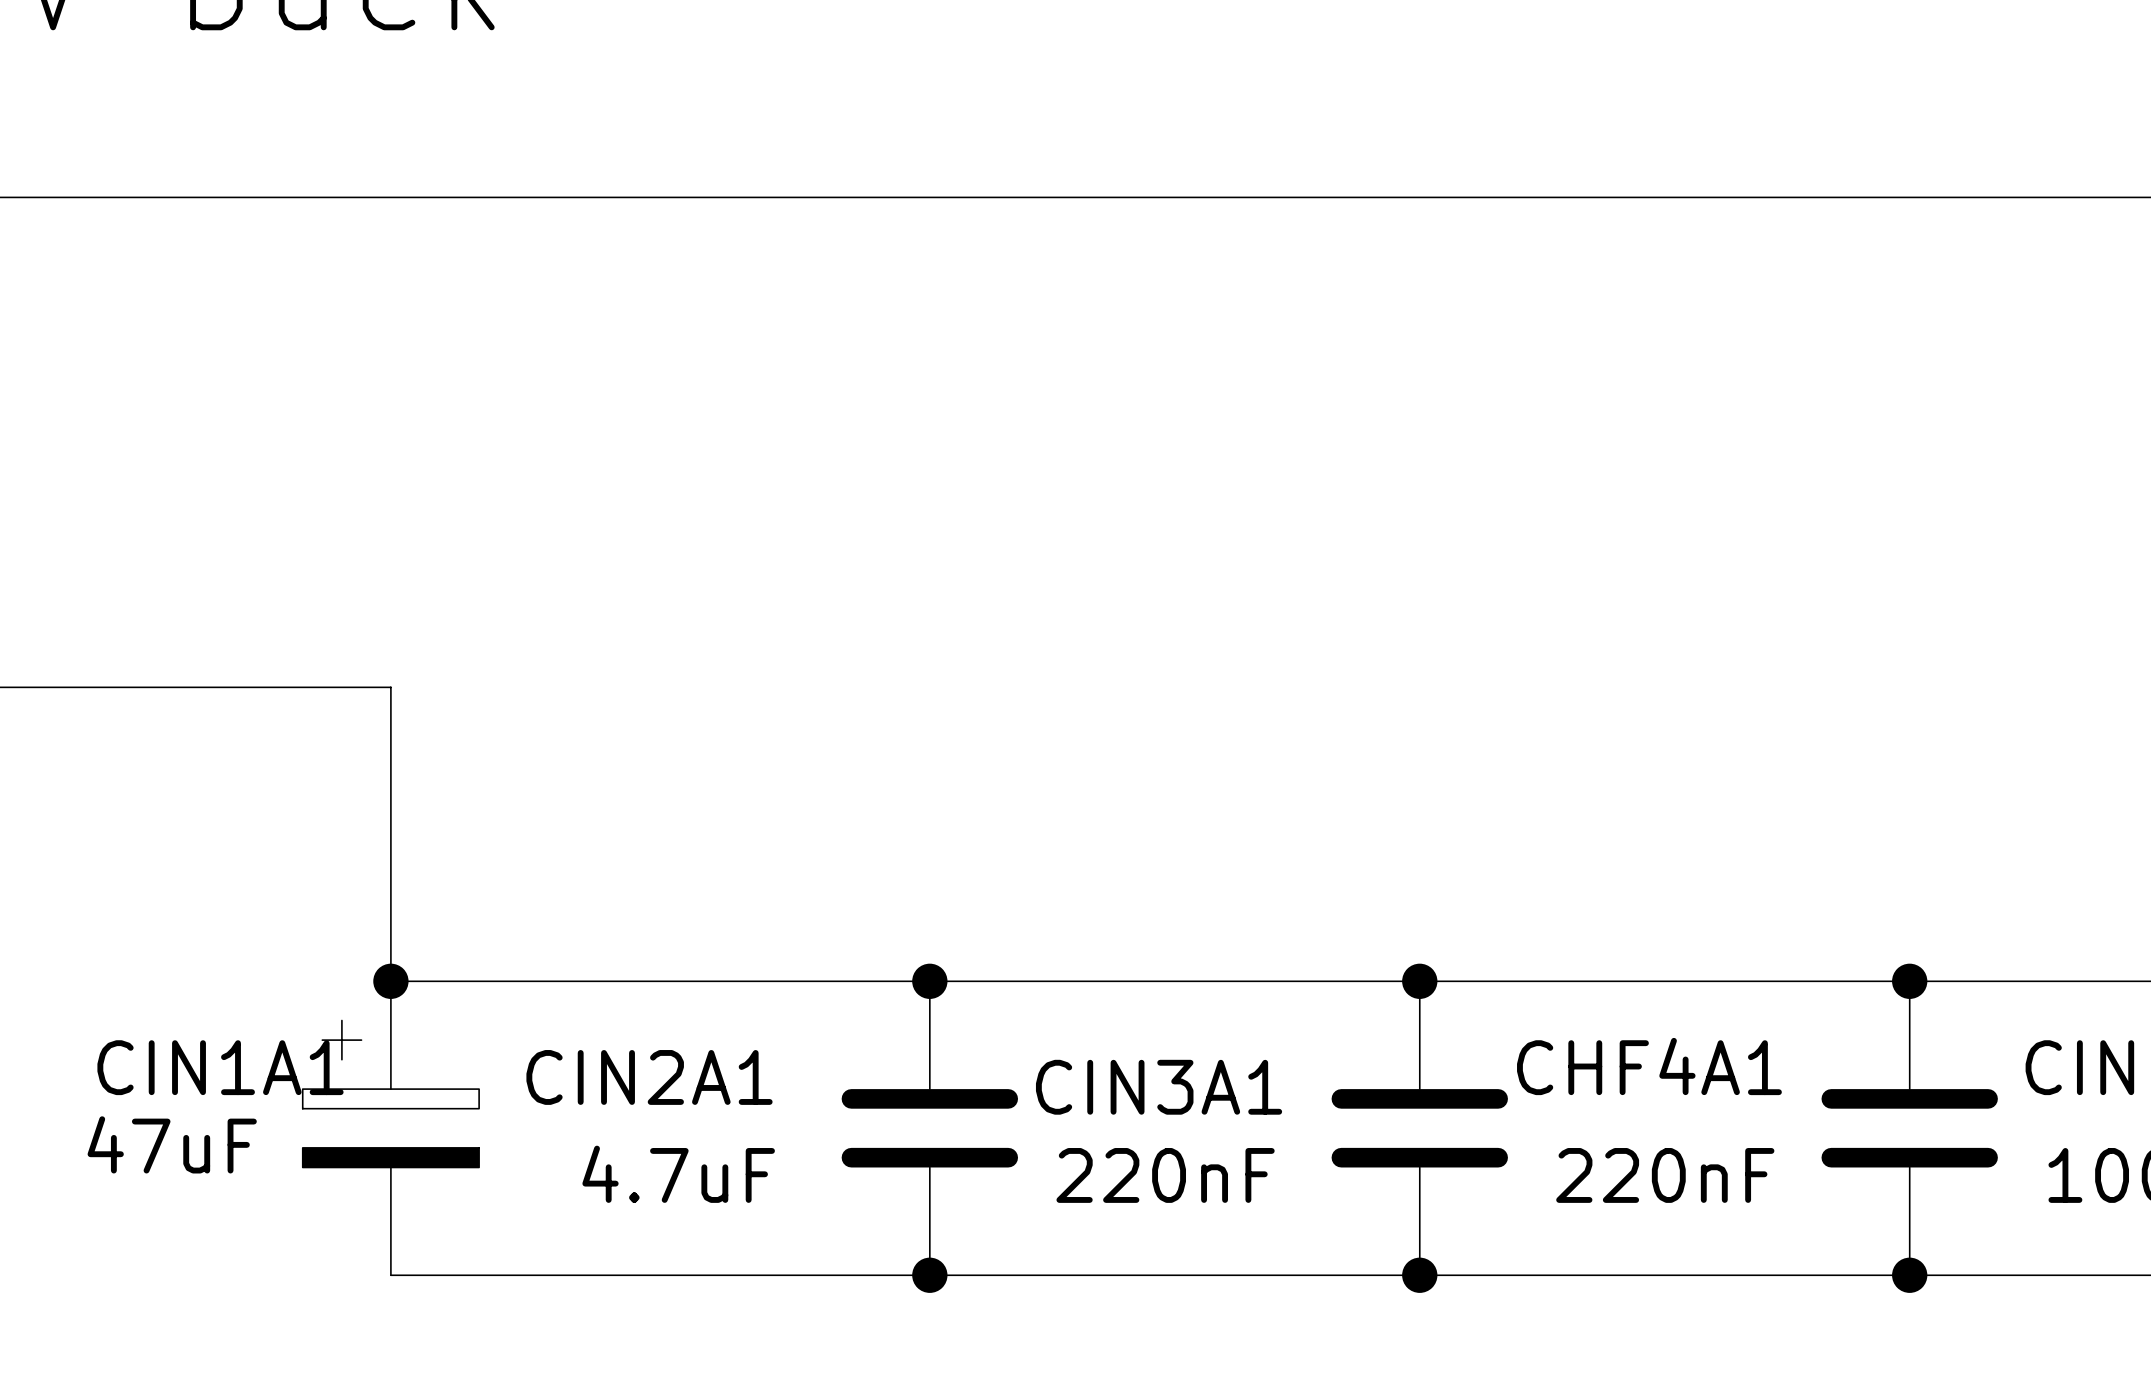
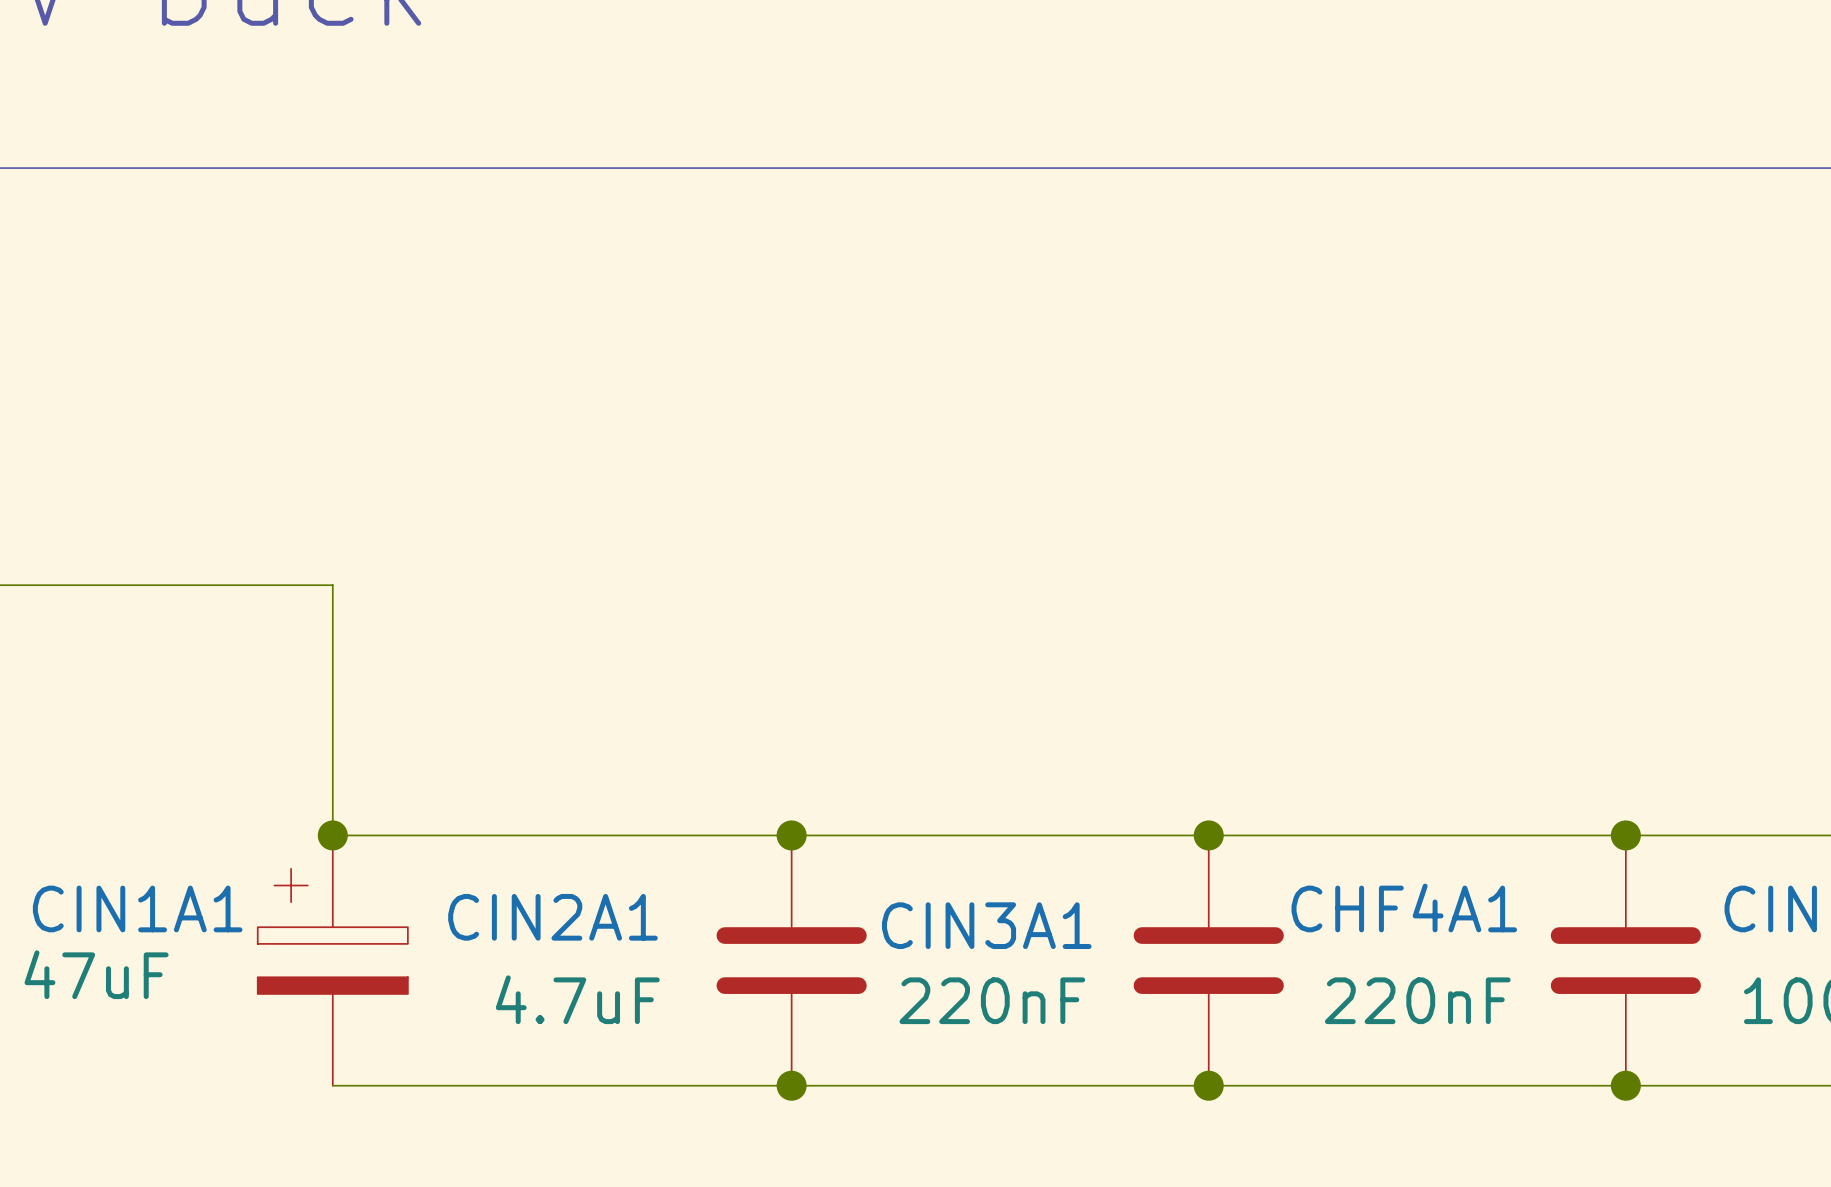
CIN1A1 name position: CIN1A1 (220, 1067) -> CIN1A1 (137, 908)
CIN1A1 value position: 47uF (172, 1144) -> 47uF (96, 974)

